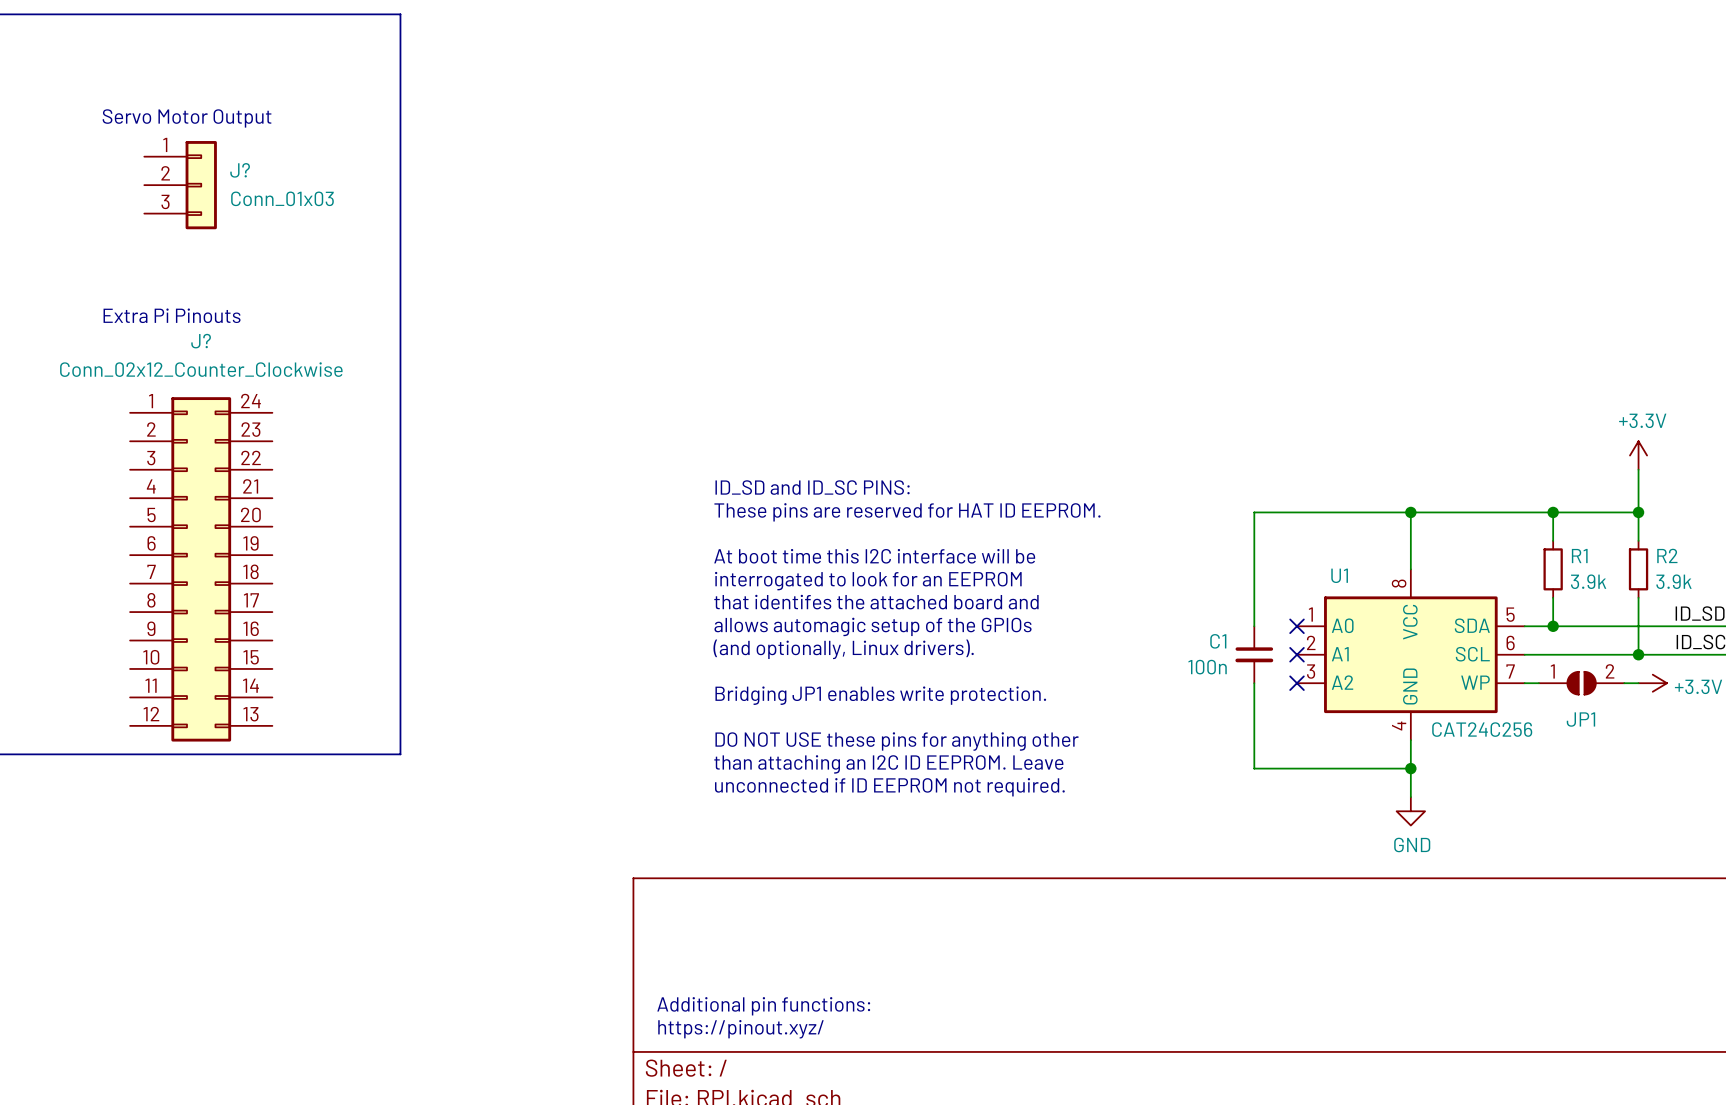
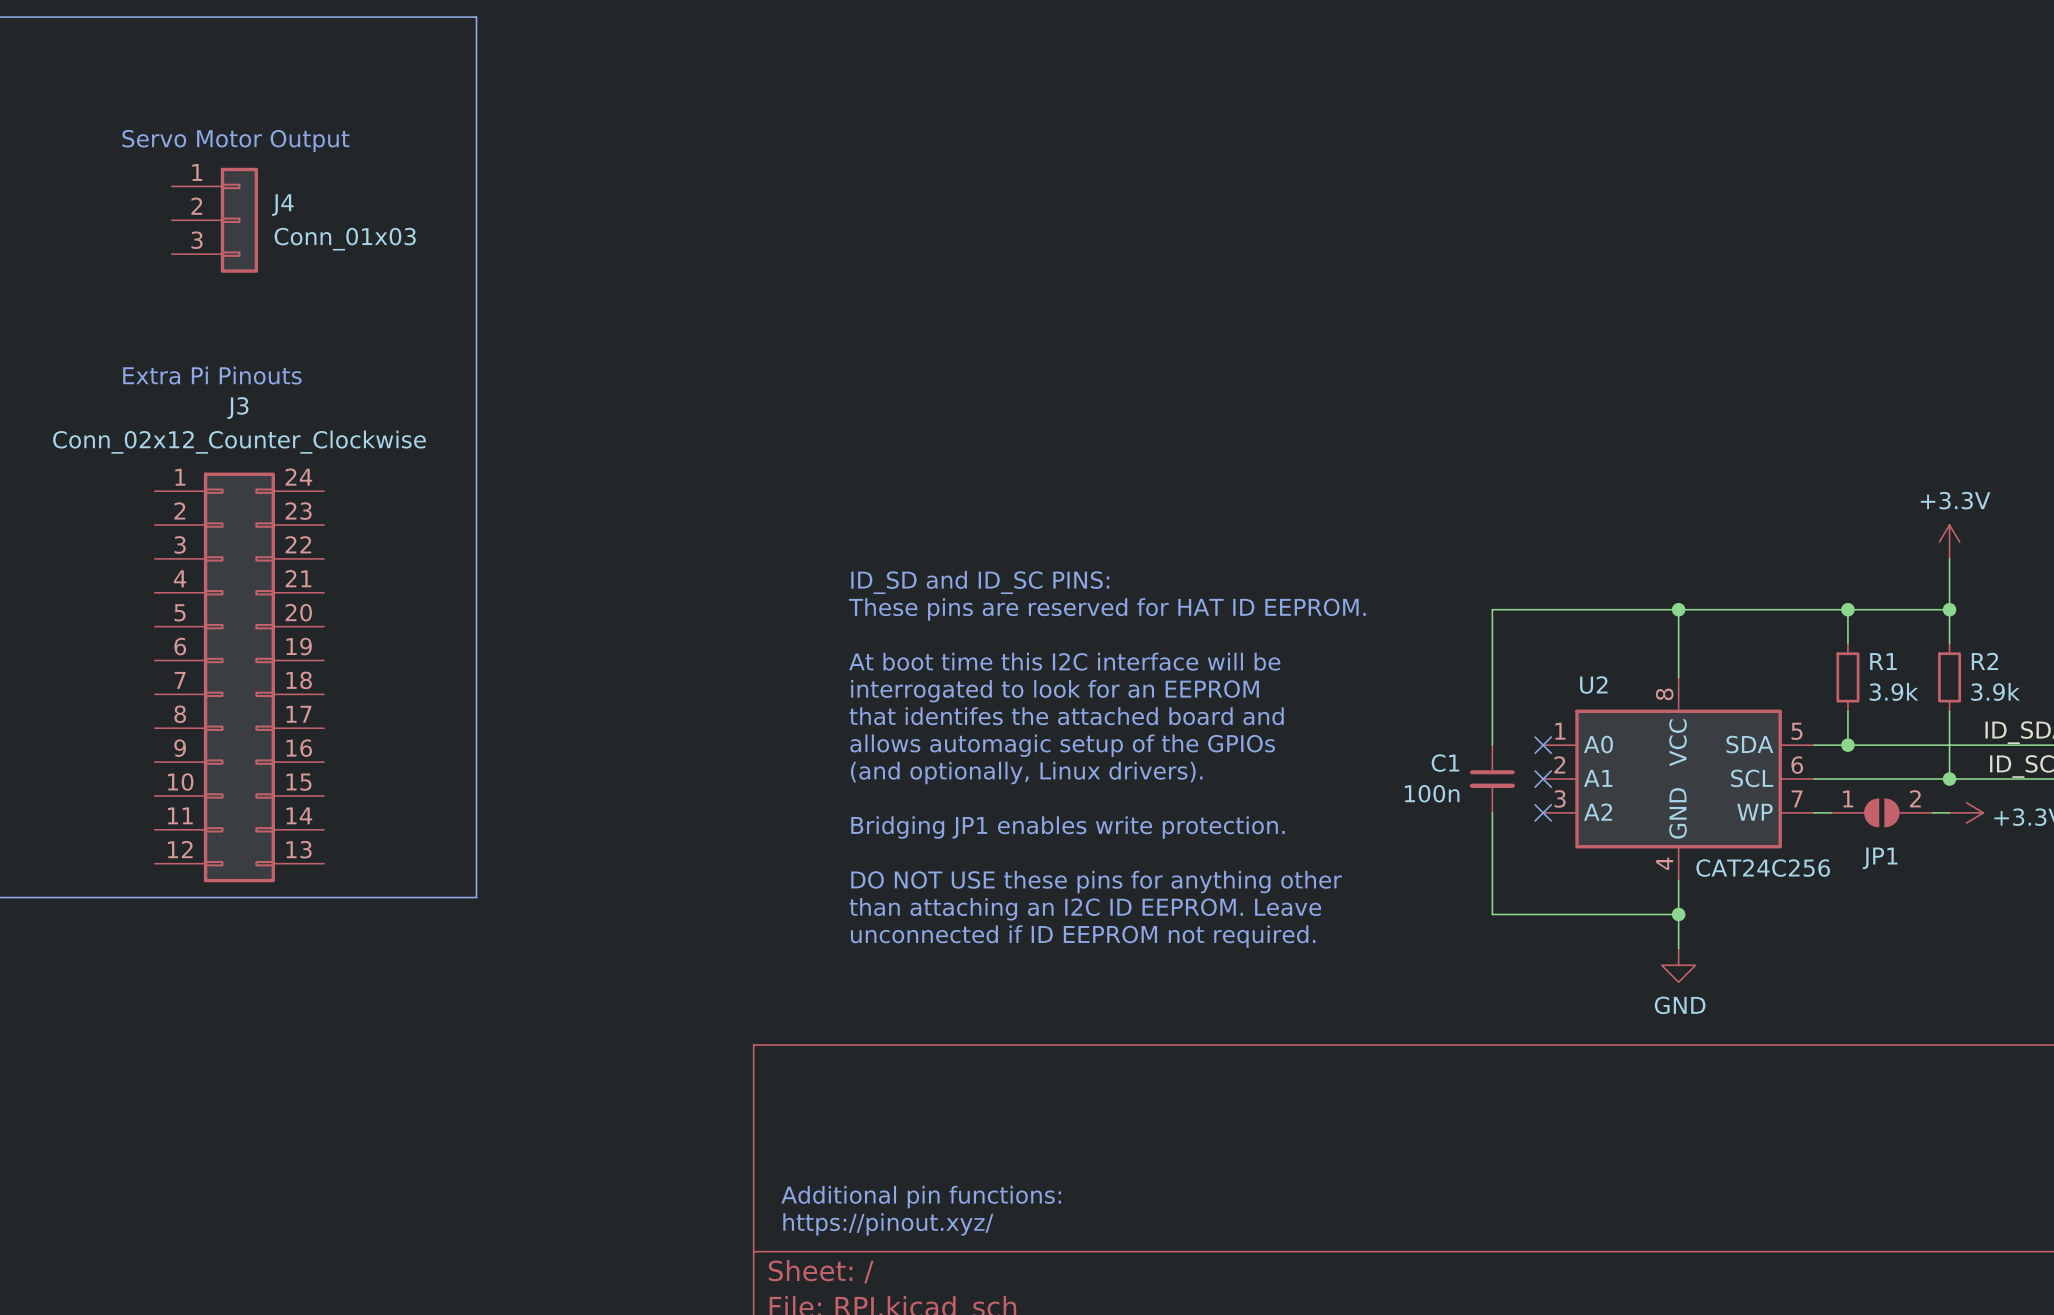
J? name: J? (240, 170) -> J4 (282, 205)
J? name: J? (201, 341) -> J3 (237, 408)
U1 name: U1 (1339, 575) -> U2 (1593, 685)

